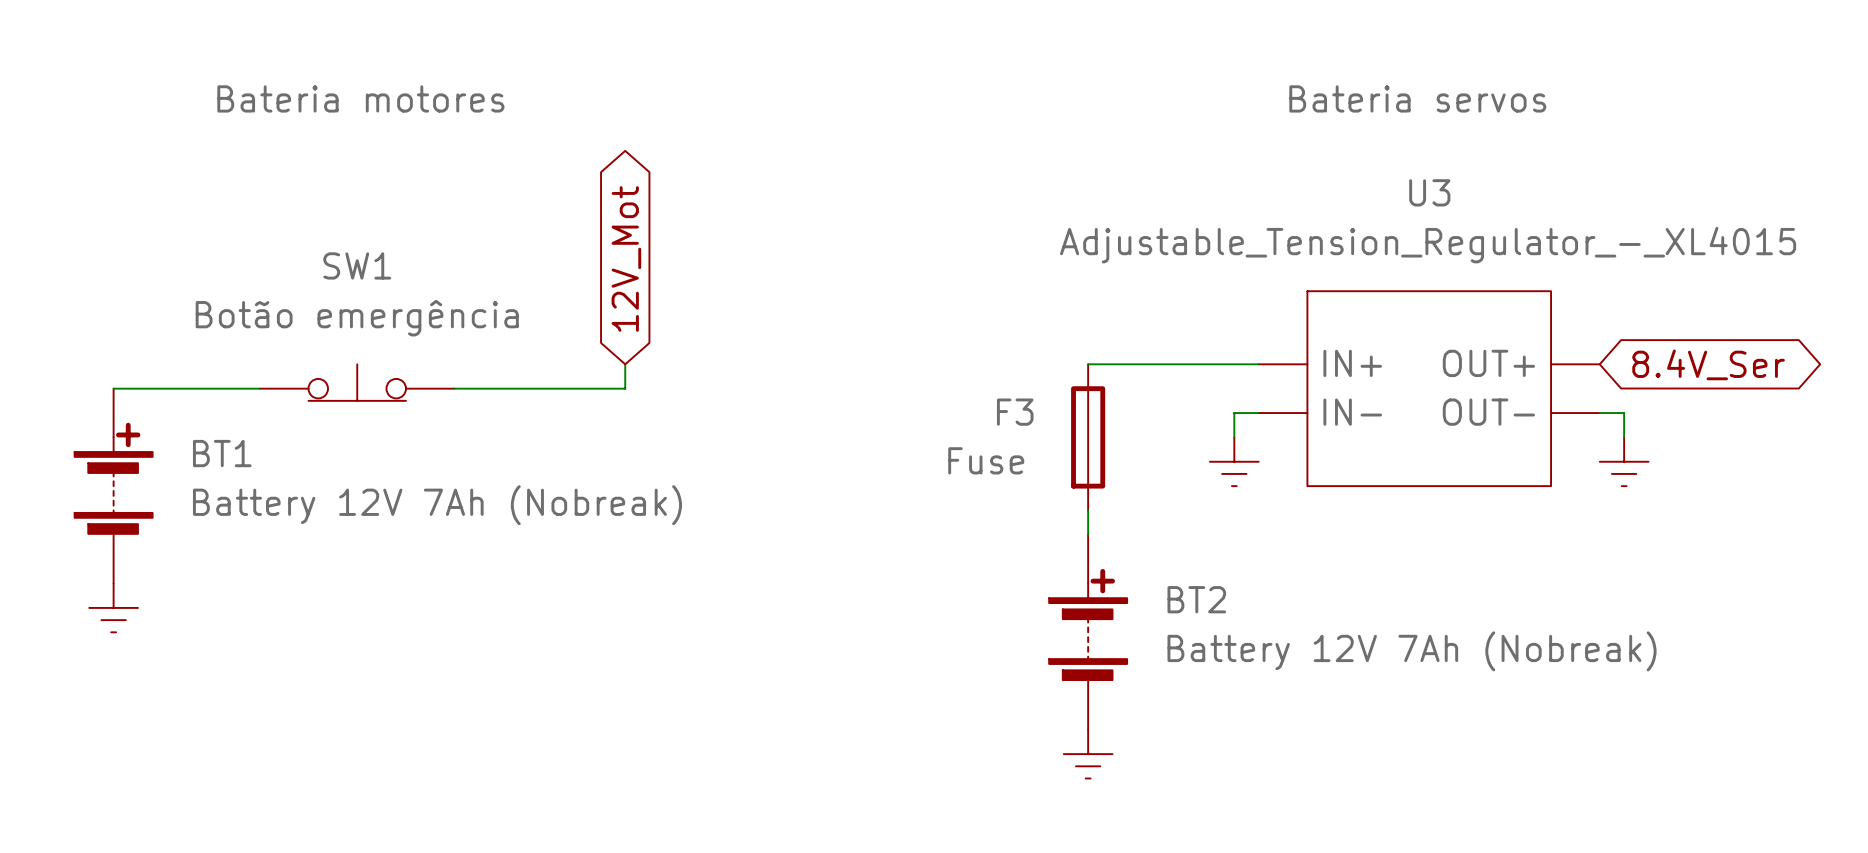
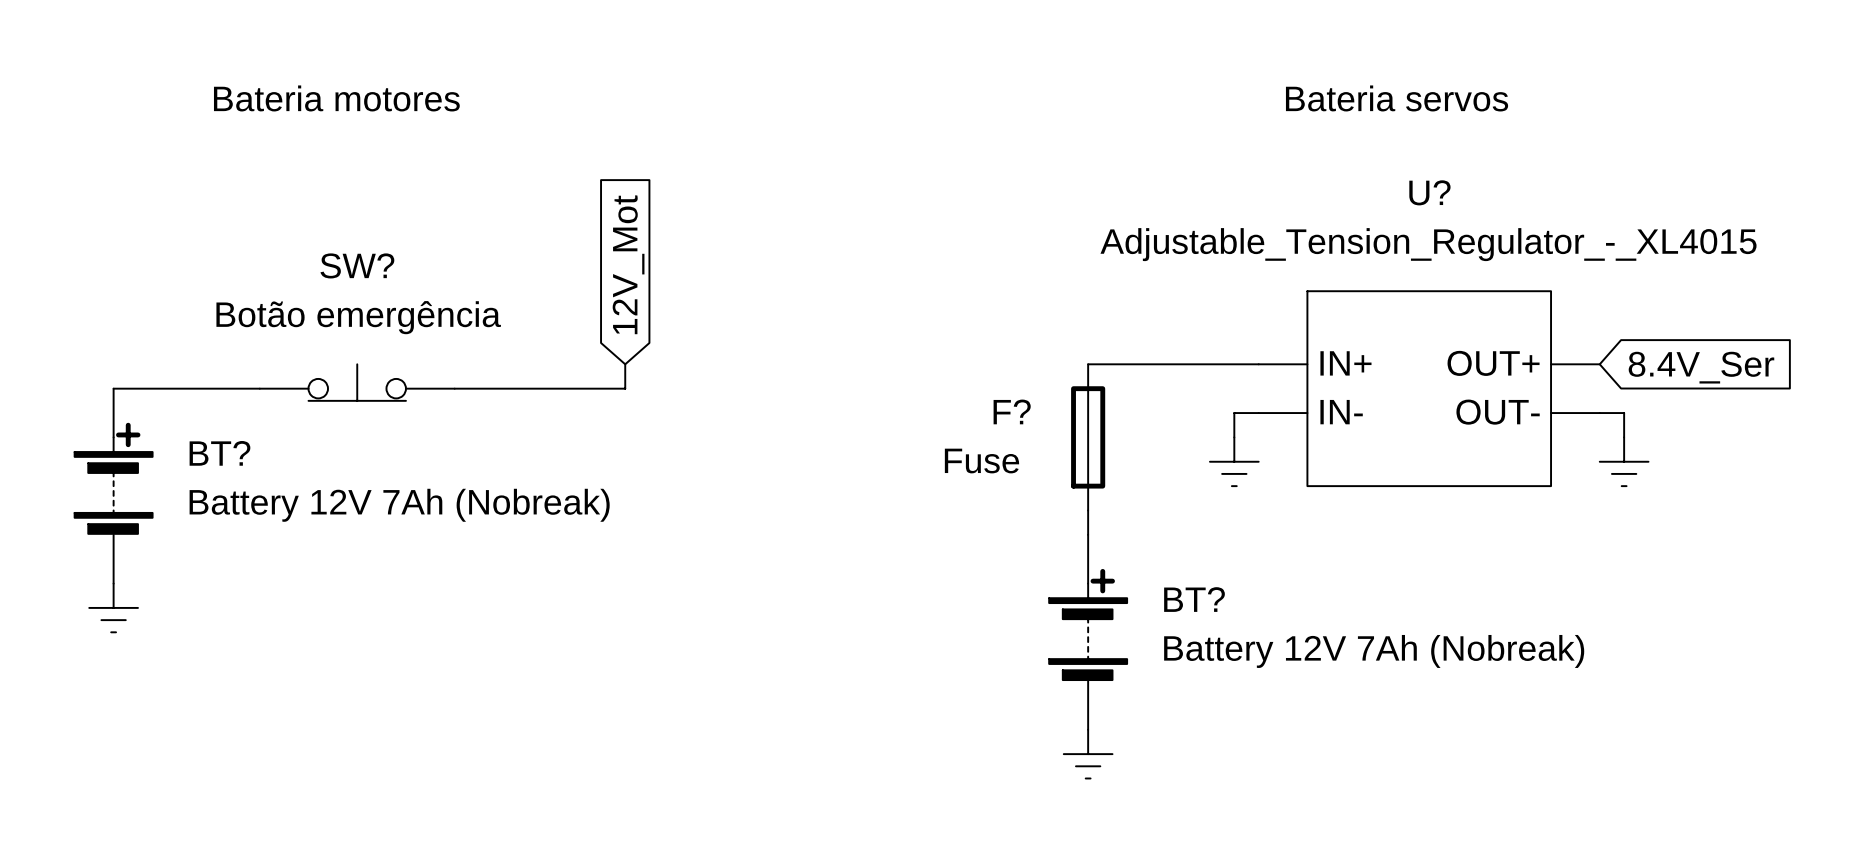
U3 name: U3 (1429, 192) -> U? (1429, 192)
global label shape: bidirectional (626, 258) -> input (628, 264)
SW1 name: SW1 (357, 265) -> SW? (357, 265)
global label shape: bidirectional (1708, 364) -> input (1701, 367)
F3 name: F3 (1015, 412) -> F? (1012, 411)
BT1 name: BT1 (222, 453) -> BT? (219, 453)
BT2 name: BT2 (1196, 599) -> BT? (1194, 599)

